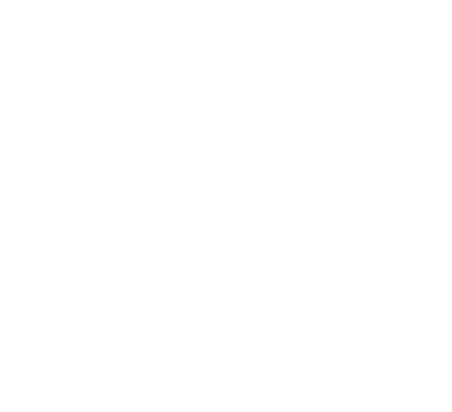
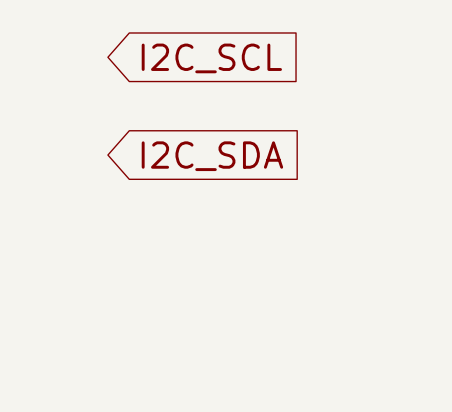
global label: none -> I2C_SCL (211, 58)
global label: none -> I2C_SDA (212, 156)

